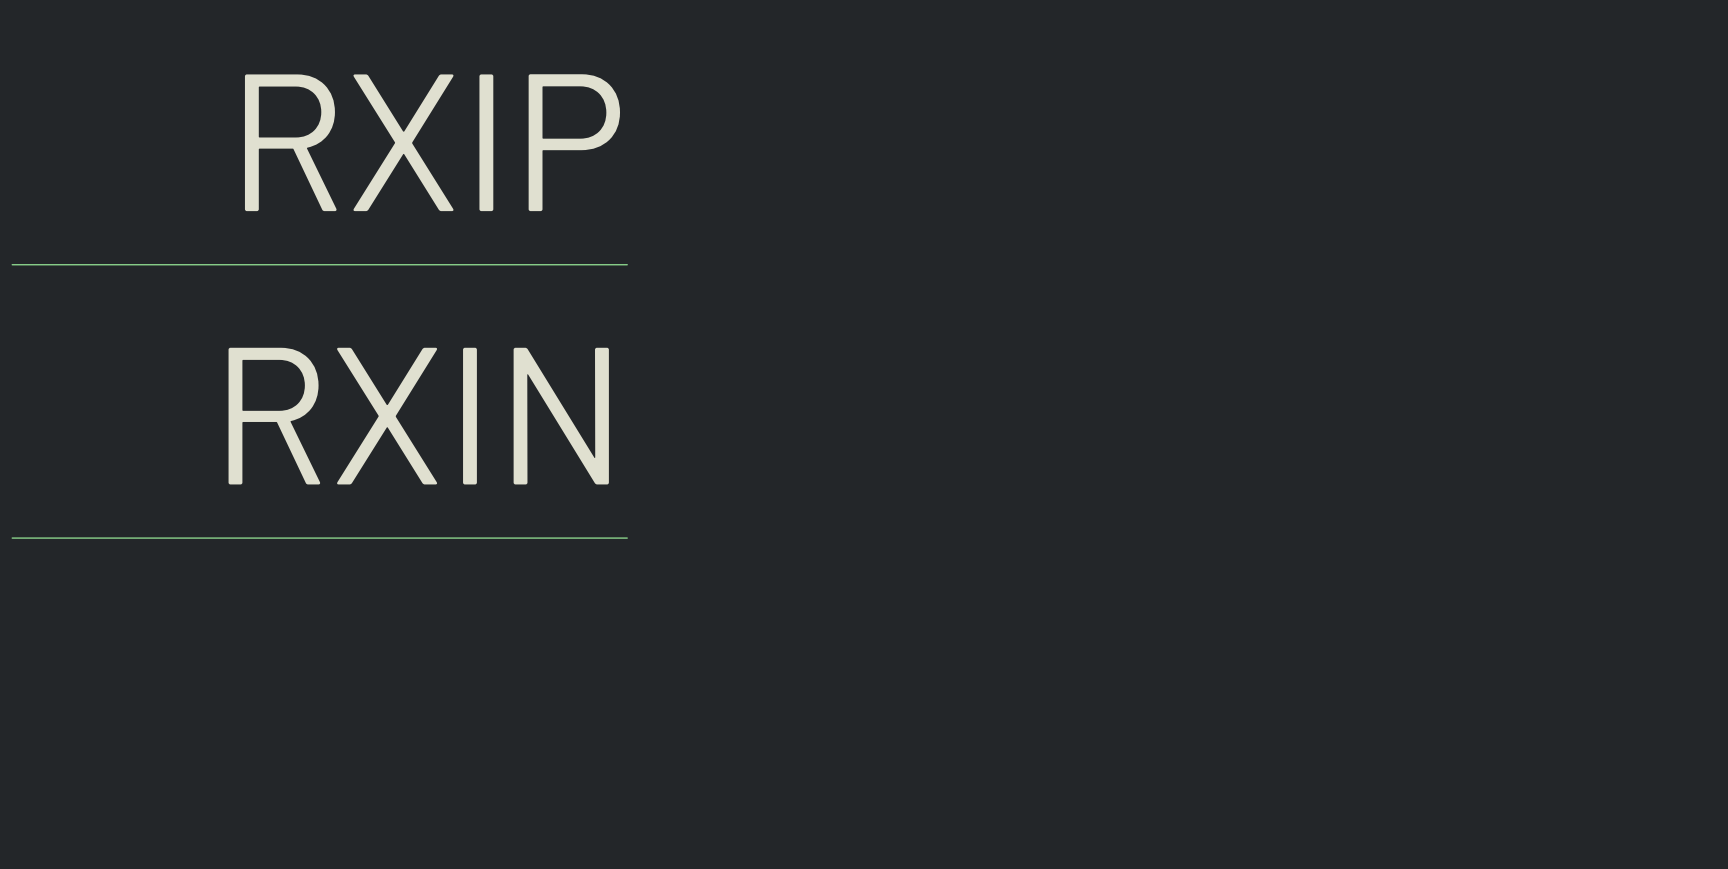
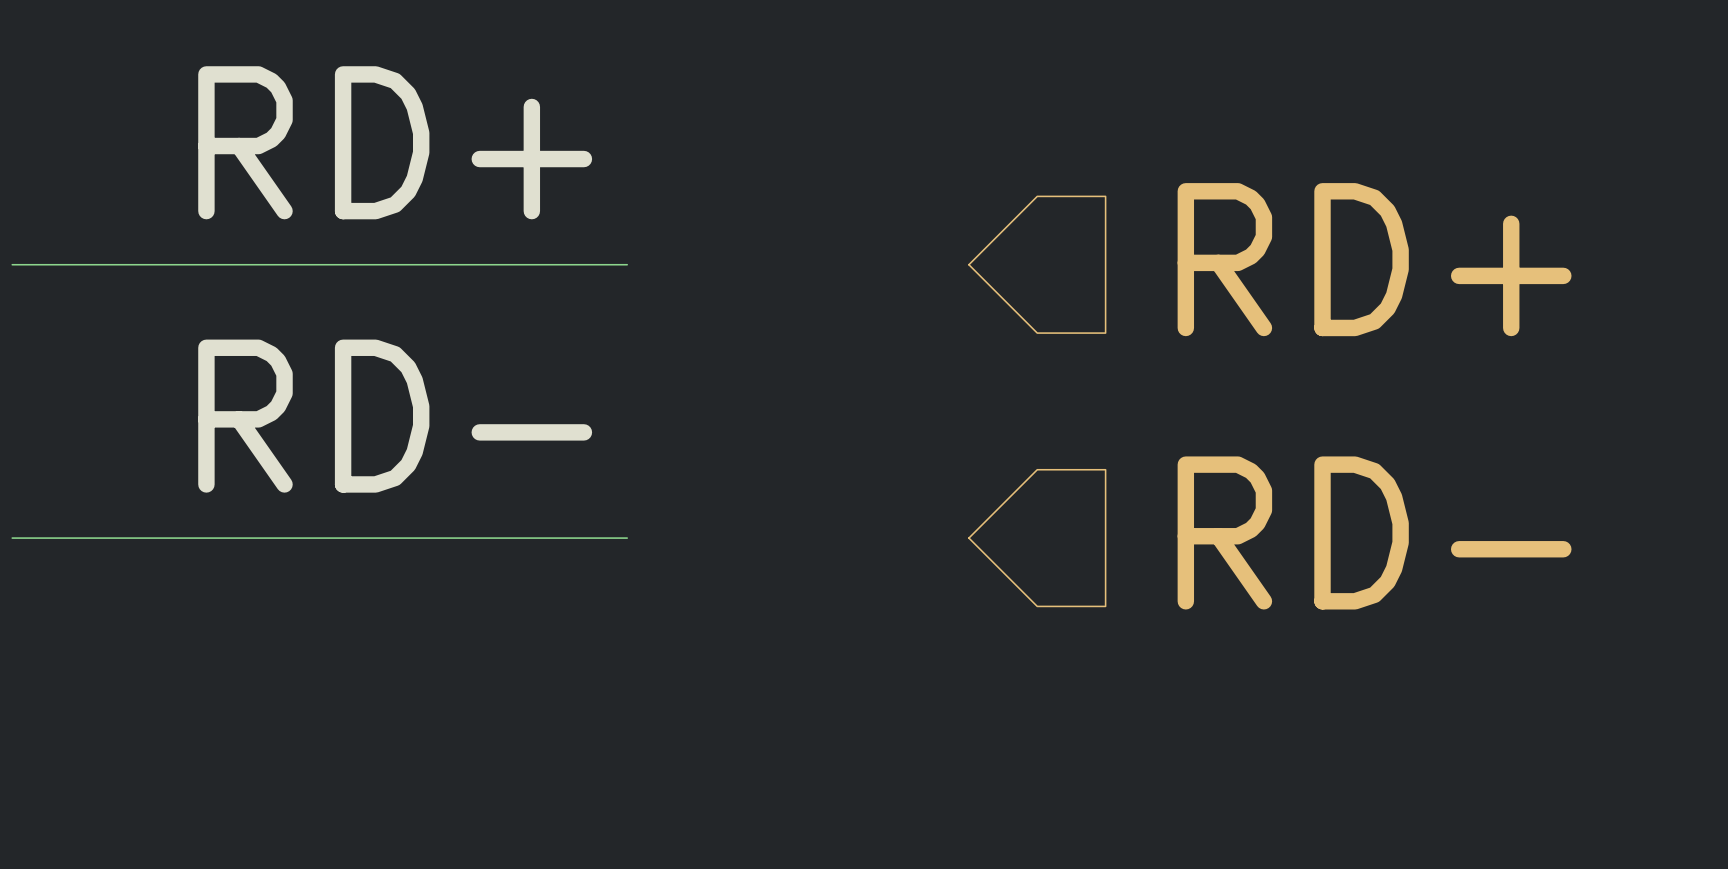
label: RXIP (432, 142) -> RD+ (395, 142)
hierarchical label: none -> RD+ (1374, 259)
label: RXIN (418, 416) -> RD- (395, 416)
hierarchical label: none -> RD- (1374, 532)

